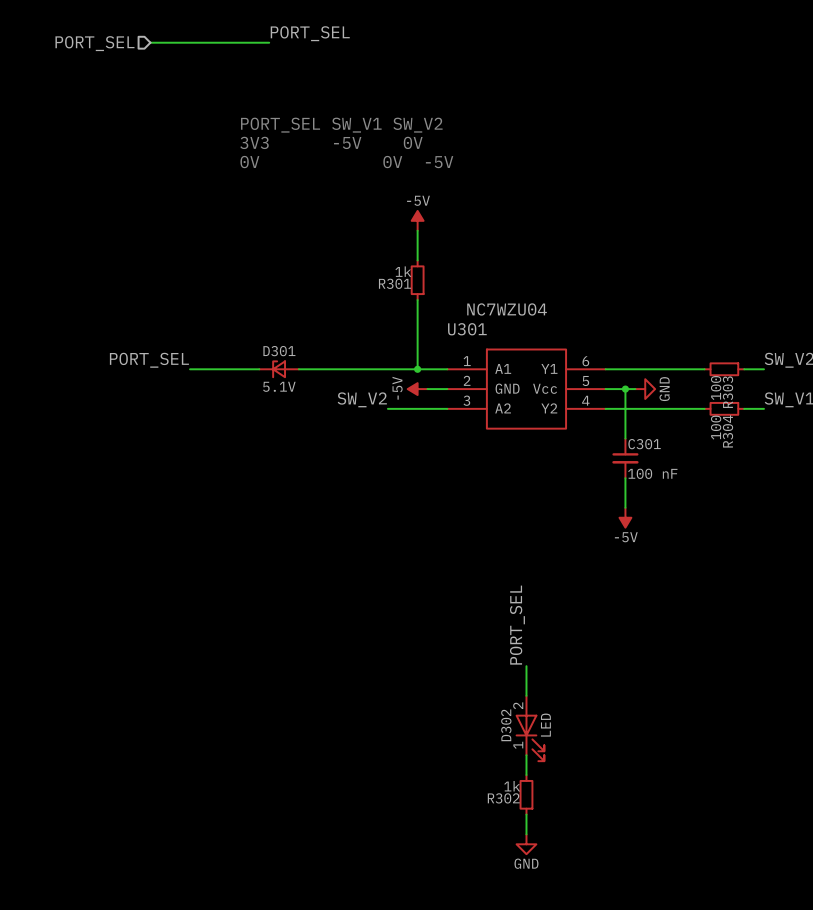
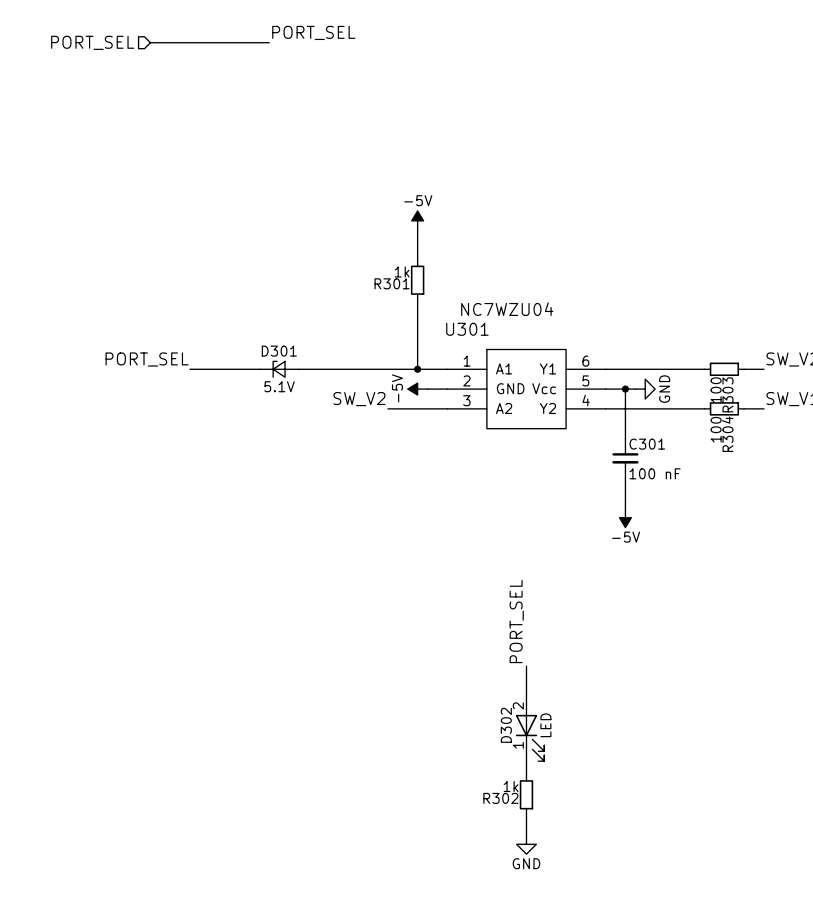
text: PORT_SEL SW_V1 SW_V2 (341, 125) -> none
text: 3V3 -5V 0V (331, 142) -> none
text: 0V 0V -5V (346, 162) -> none

